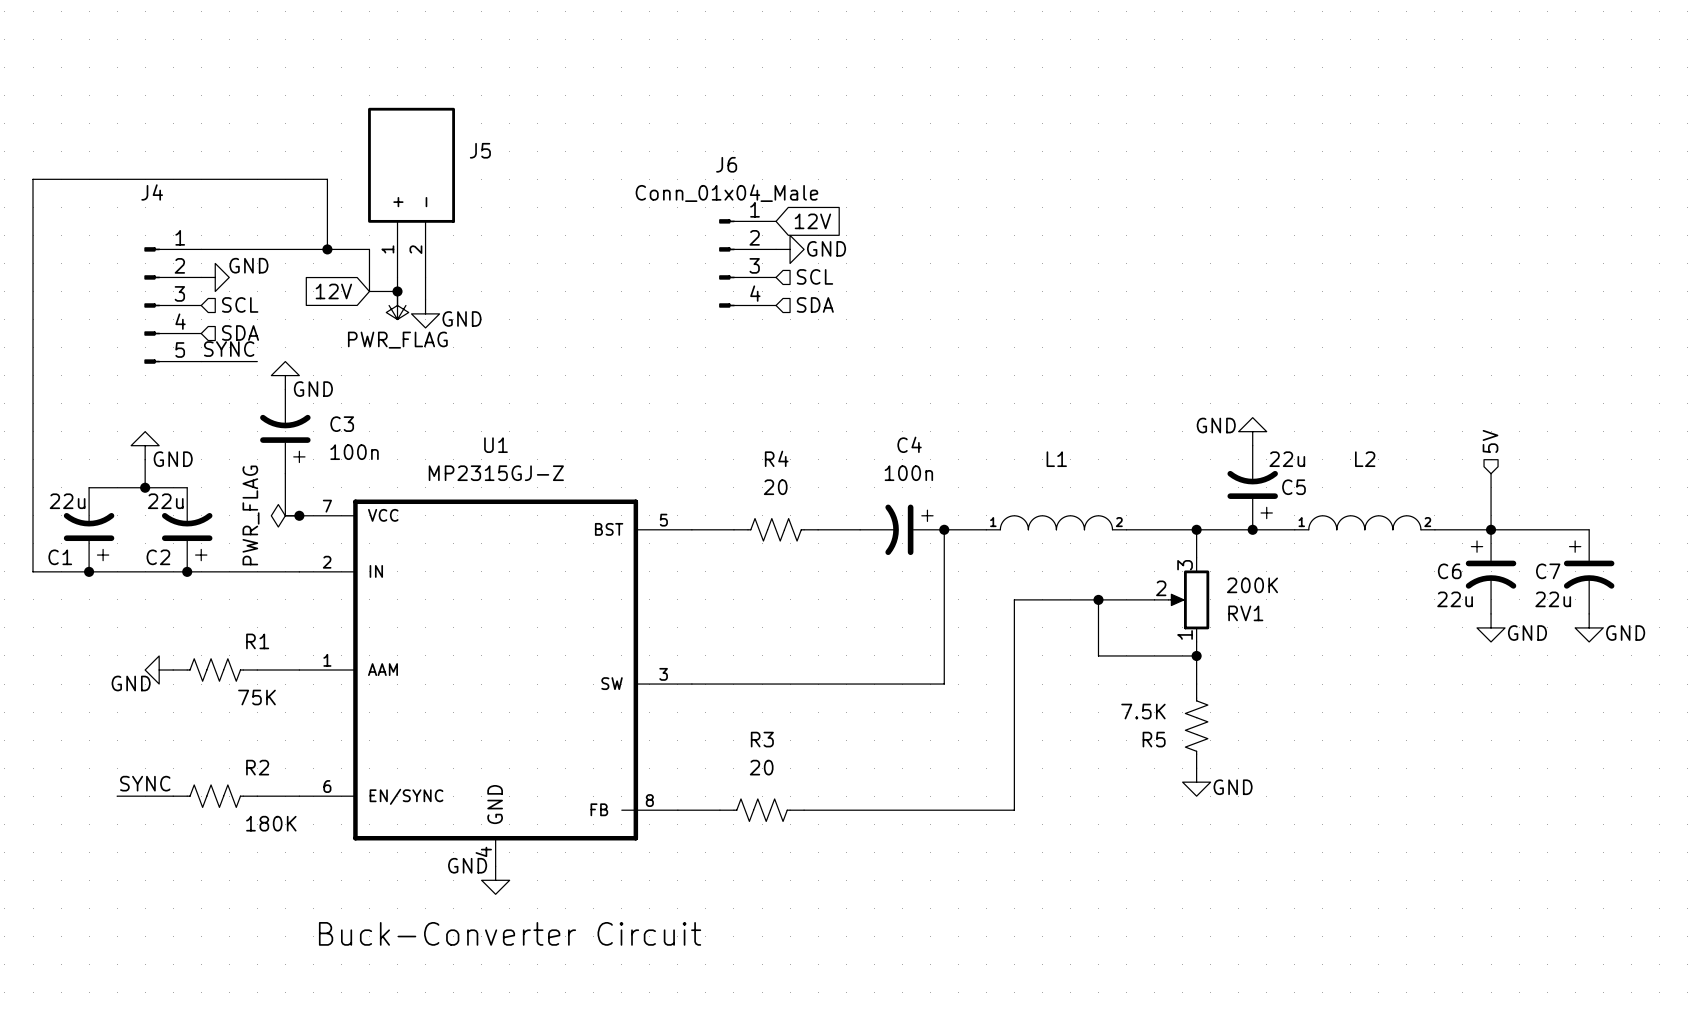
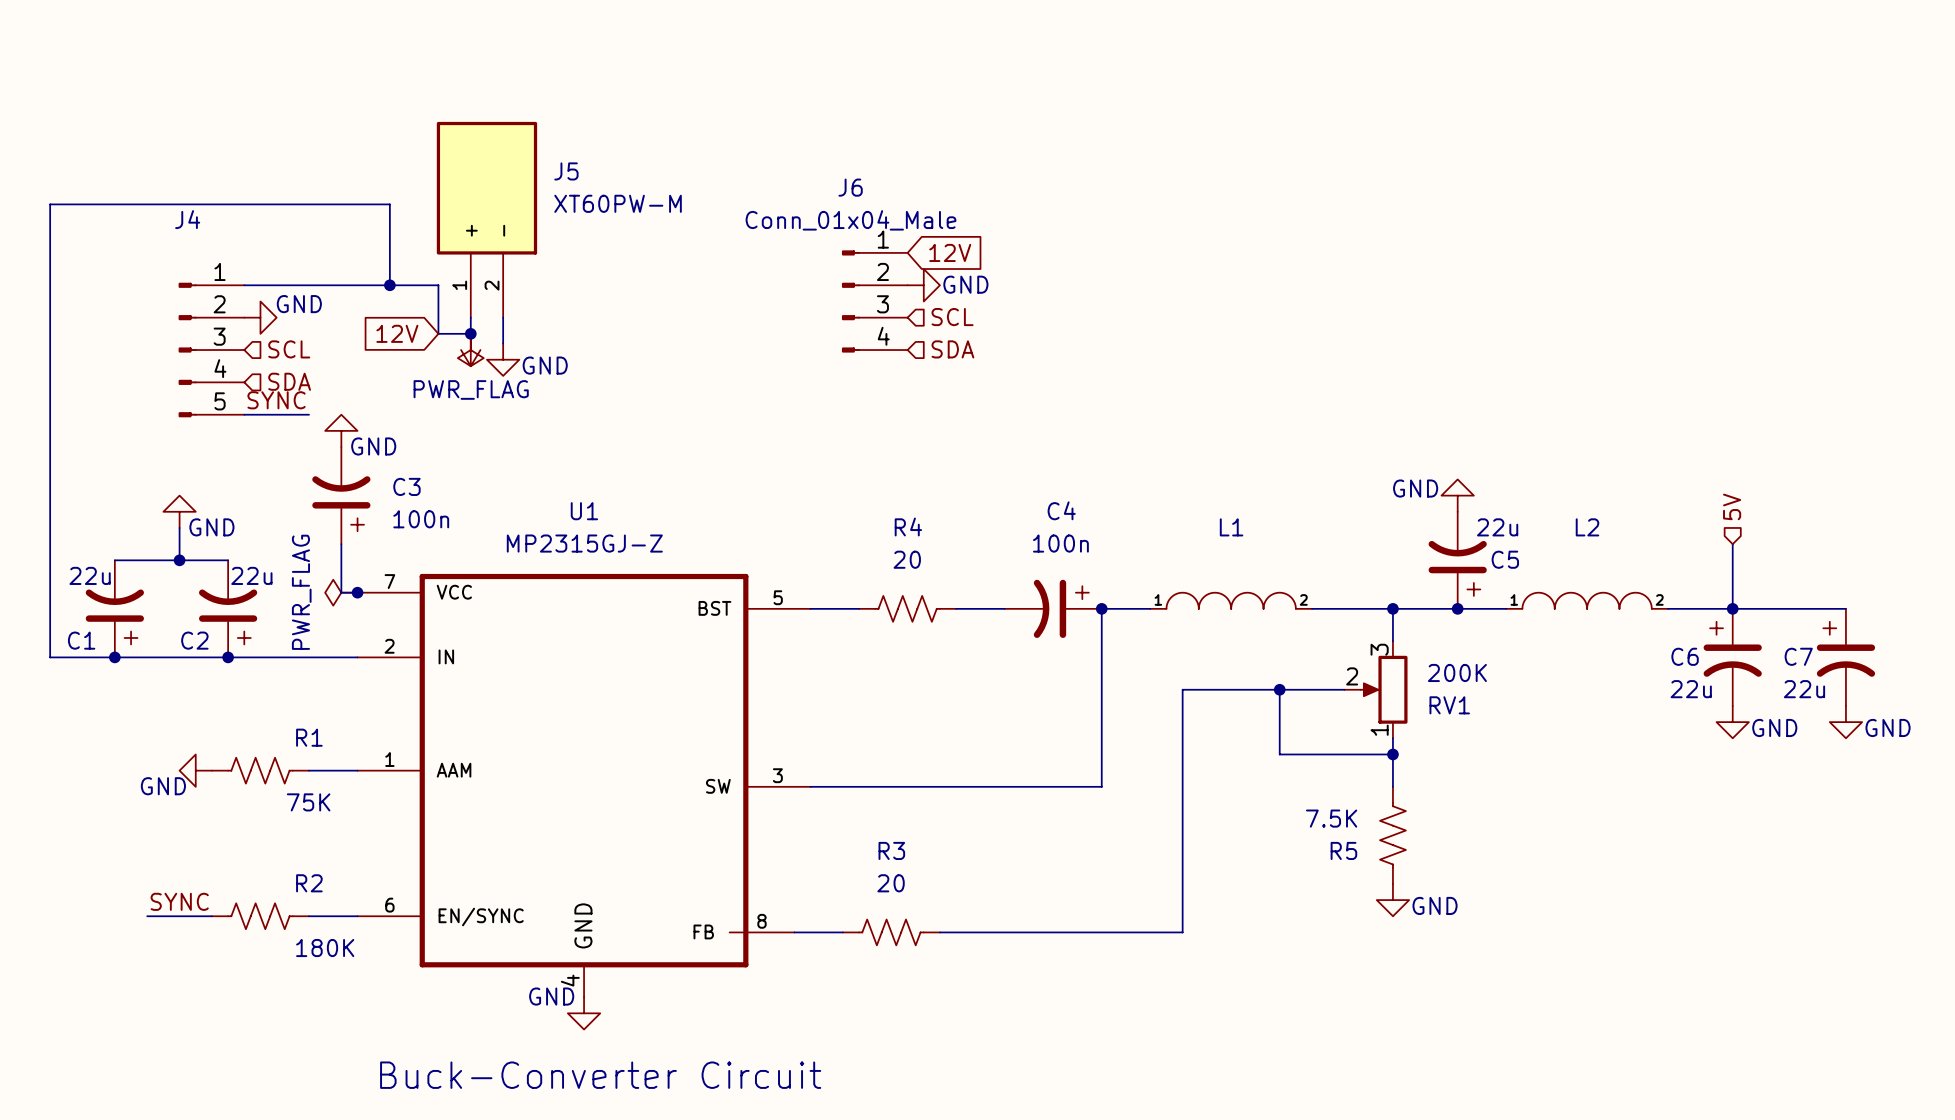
J5 value: none -> XT60PW-M (618, 203)
C2 value position: 22u (165, 501) -> 22u (251, 575)

